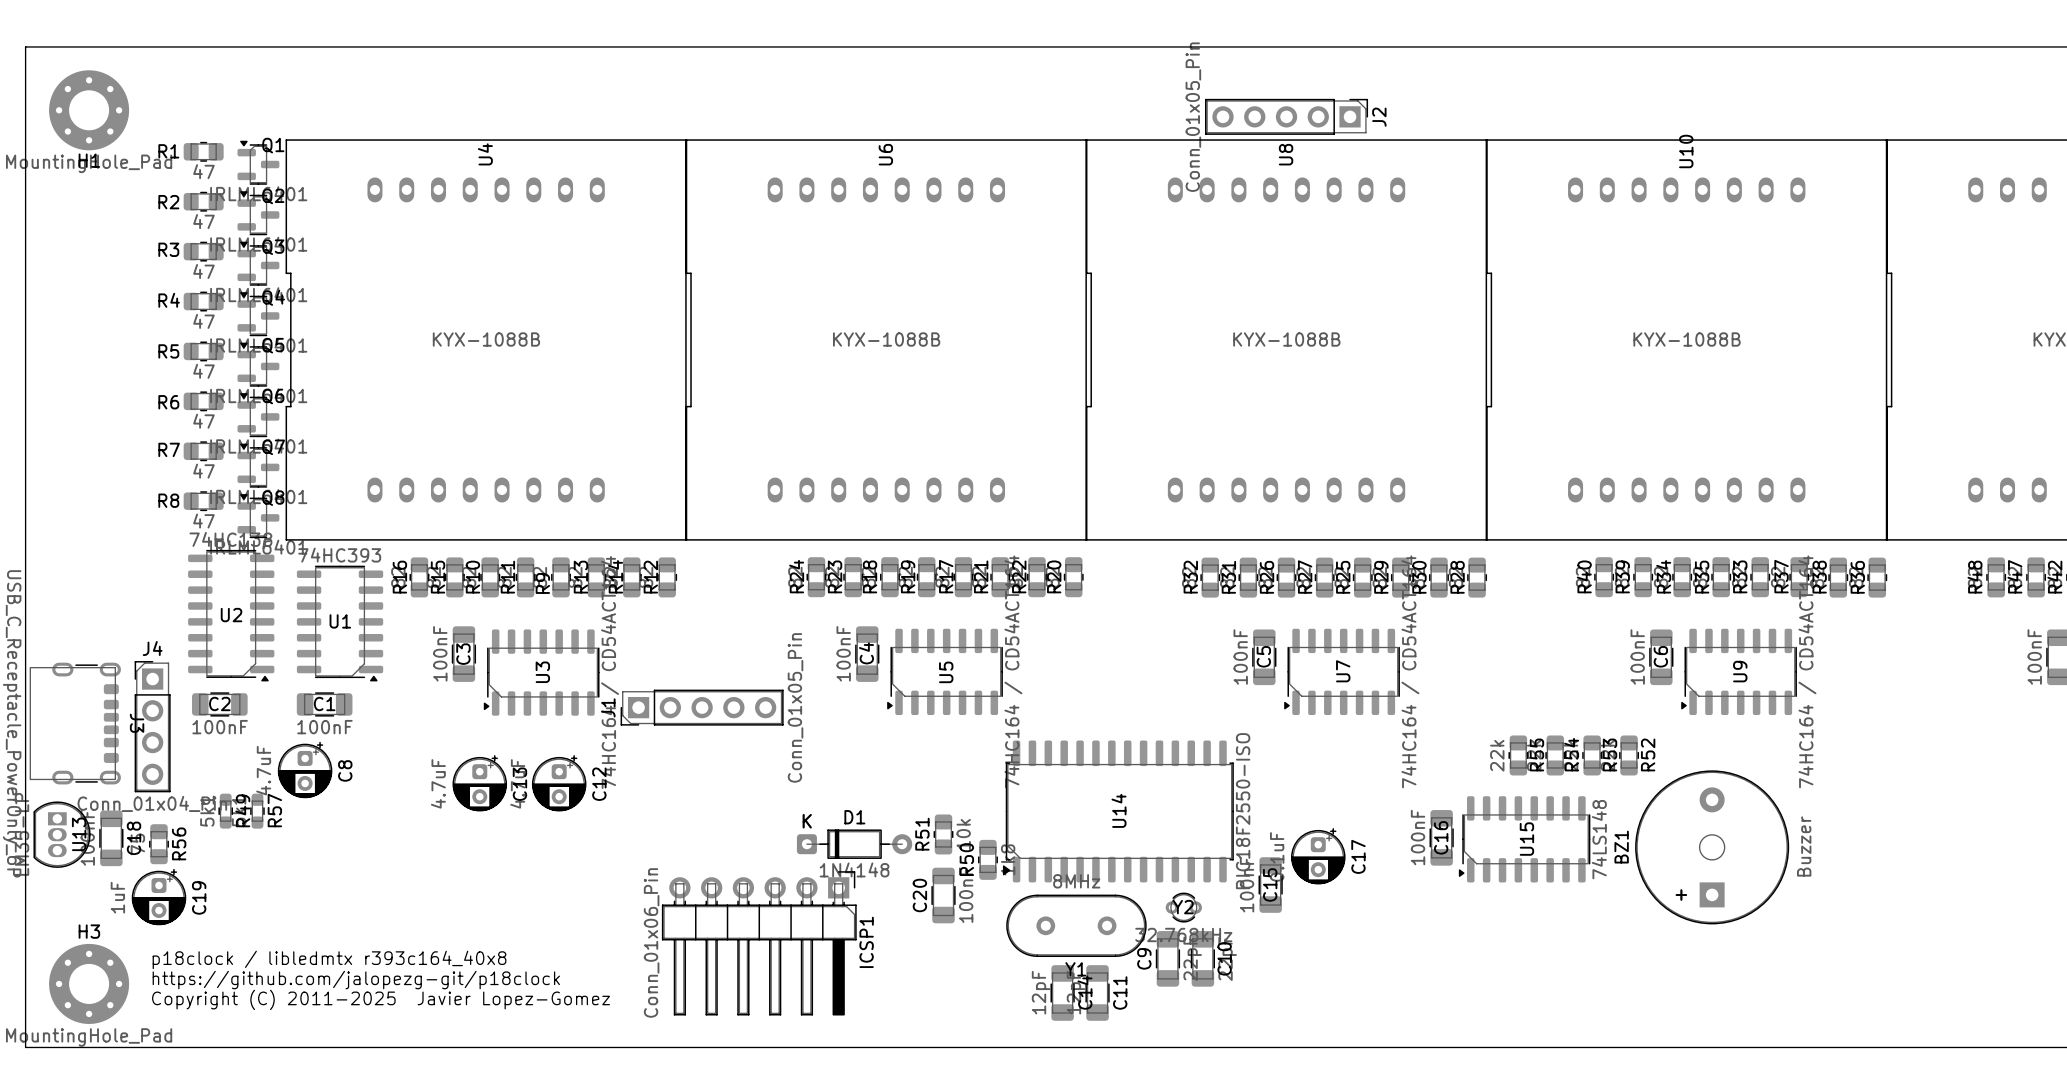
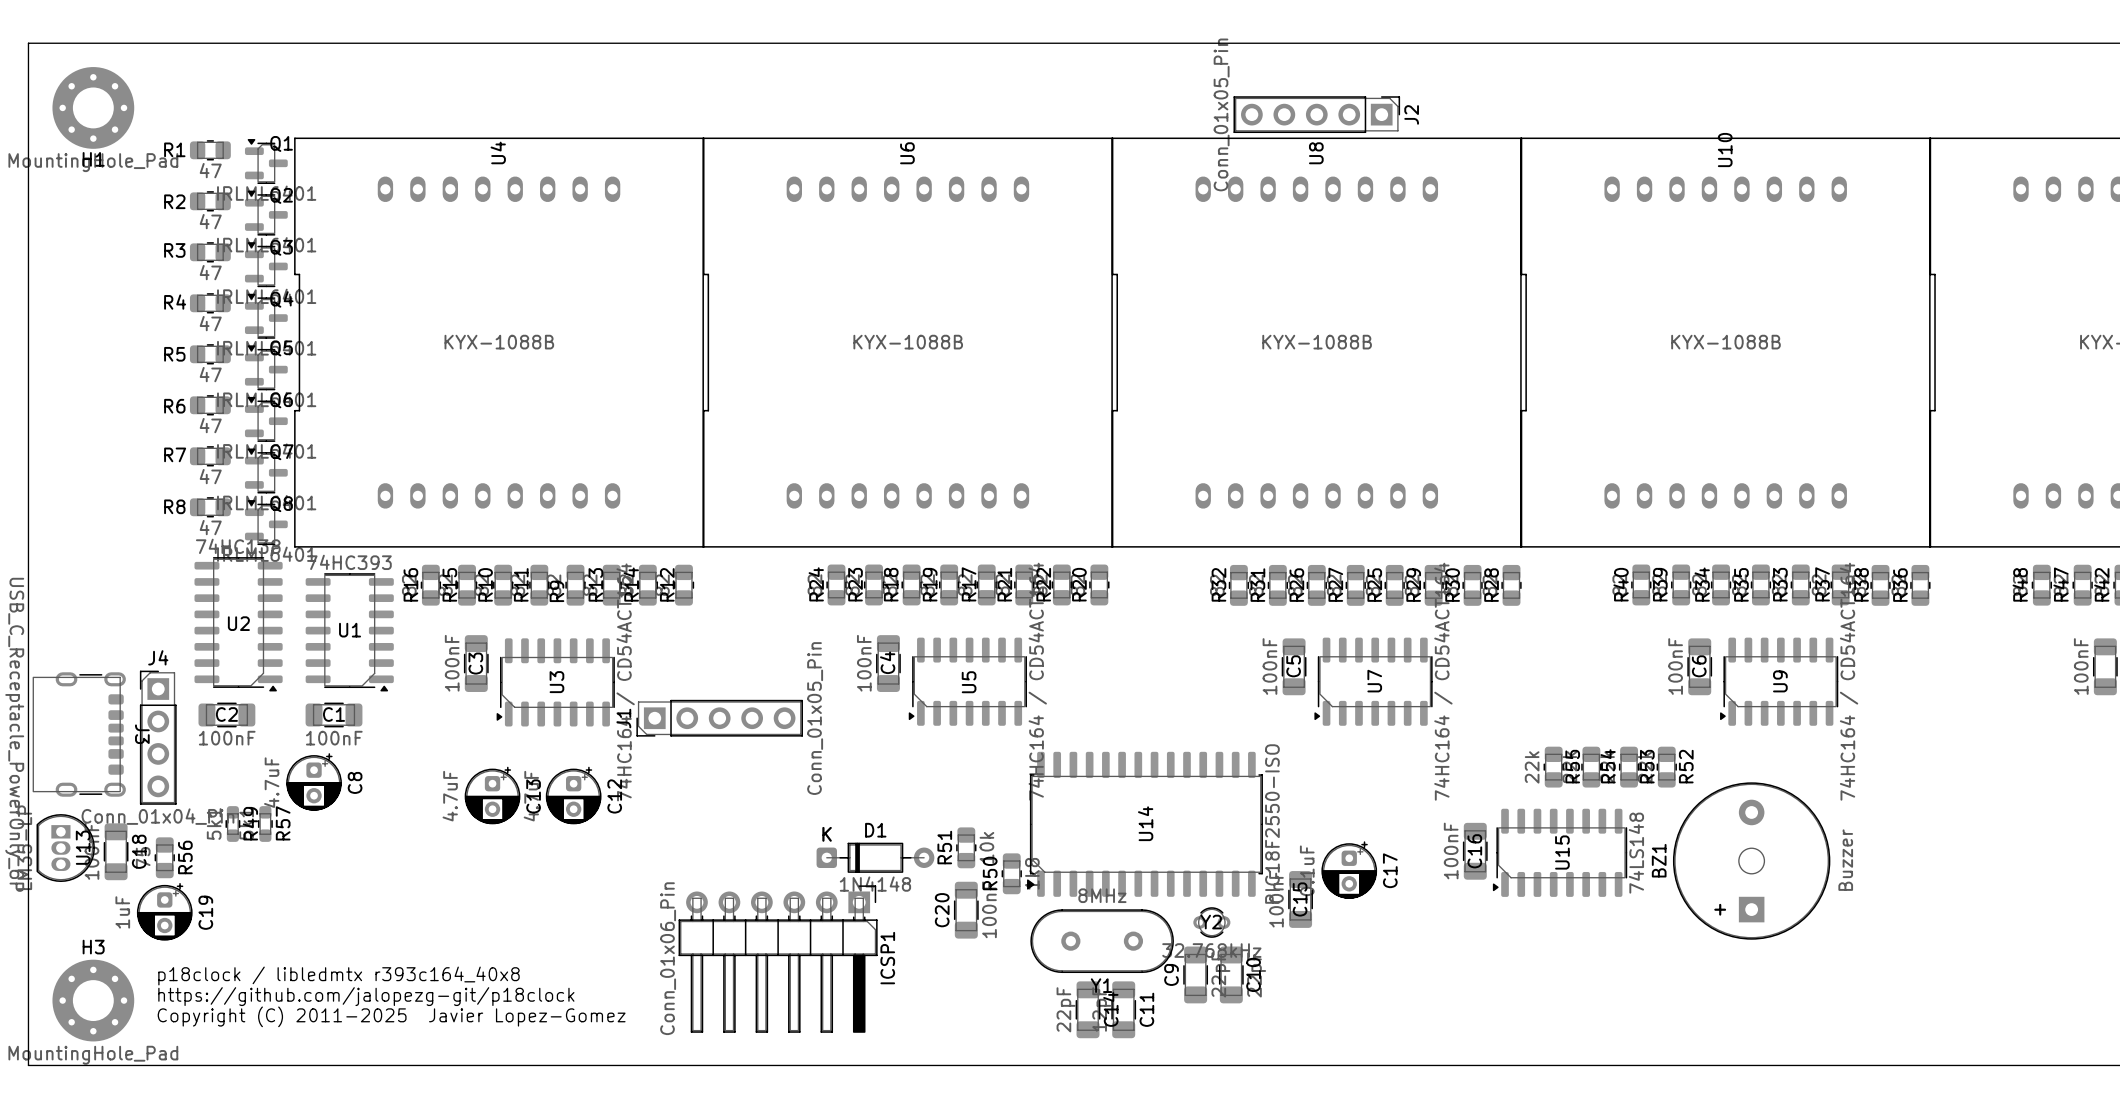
C14 value: 12pF (1041, 992) -> 22pF (1066, 1009)

